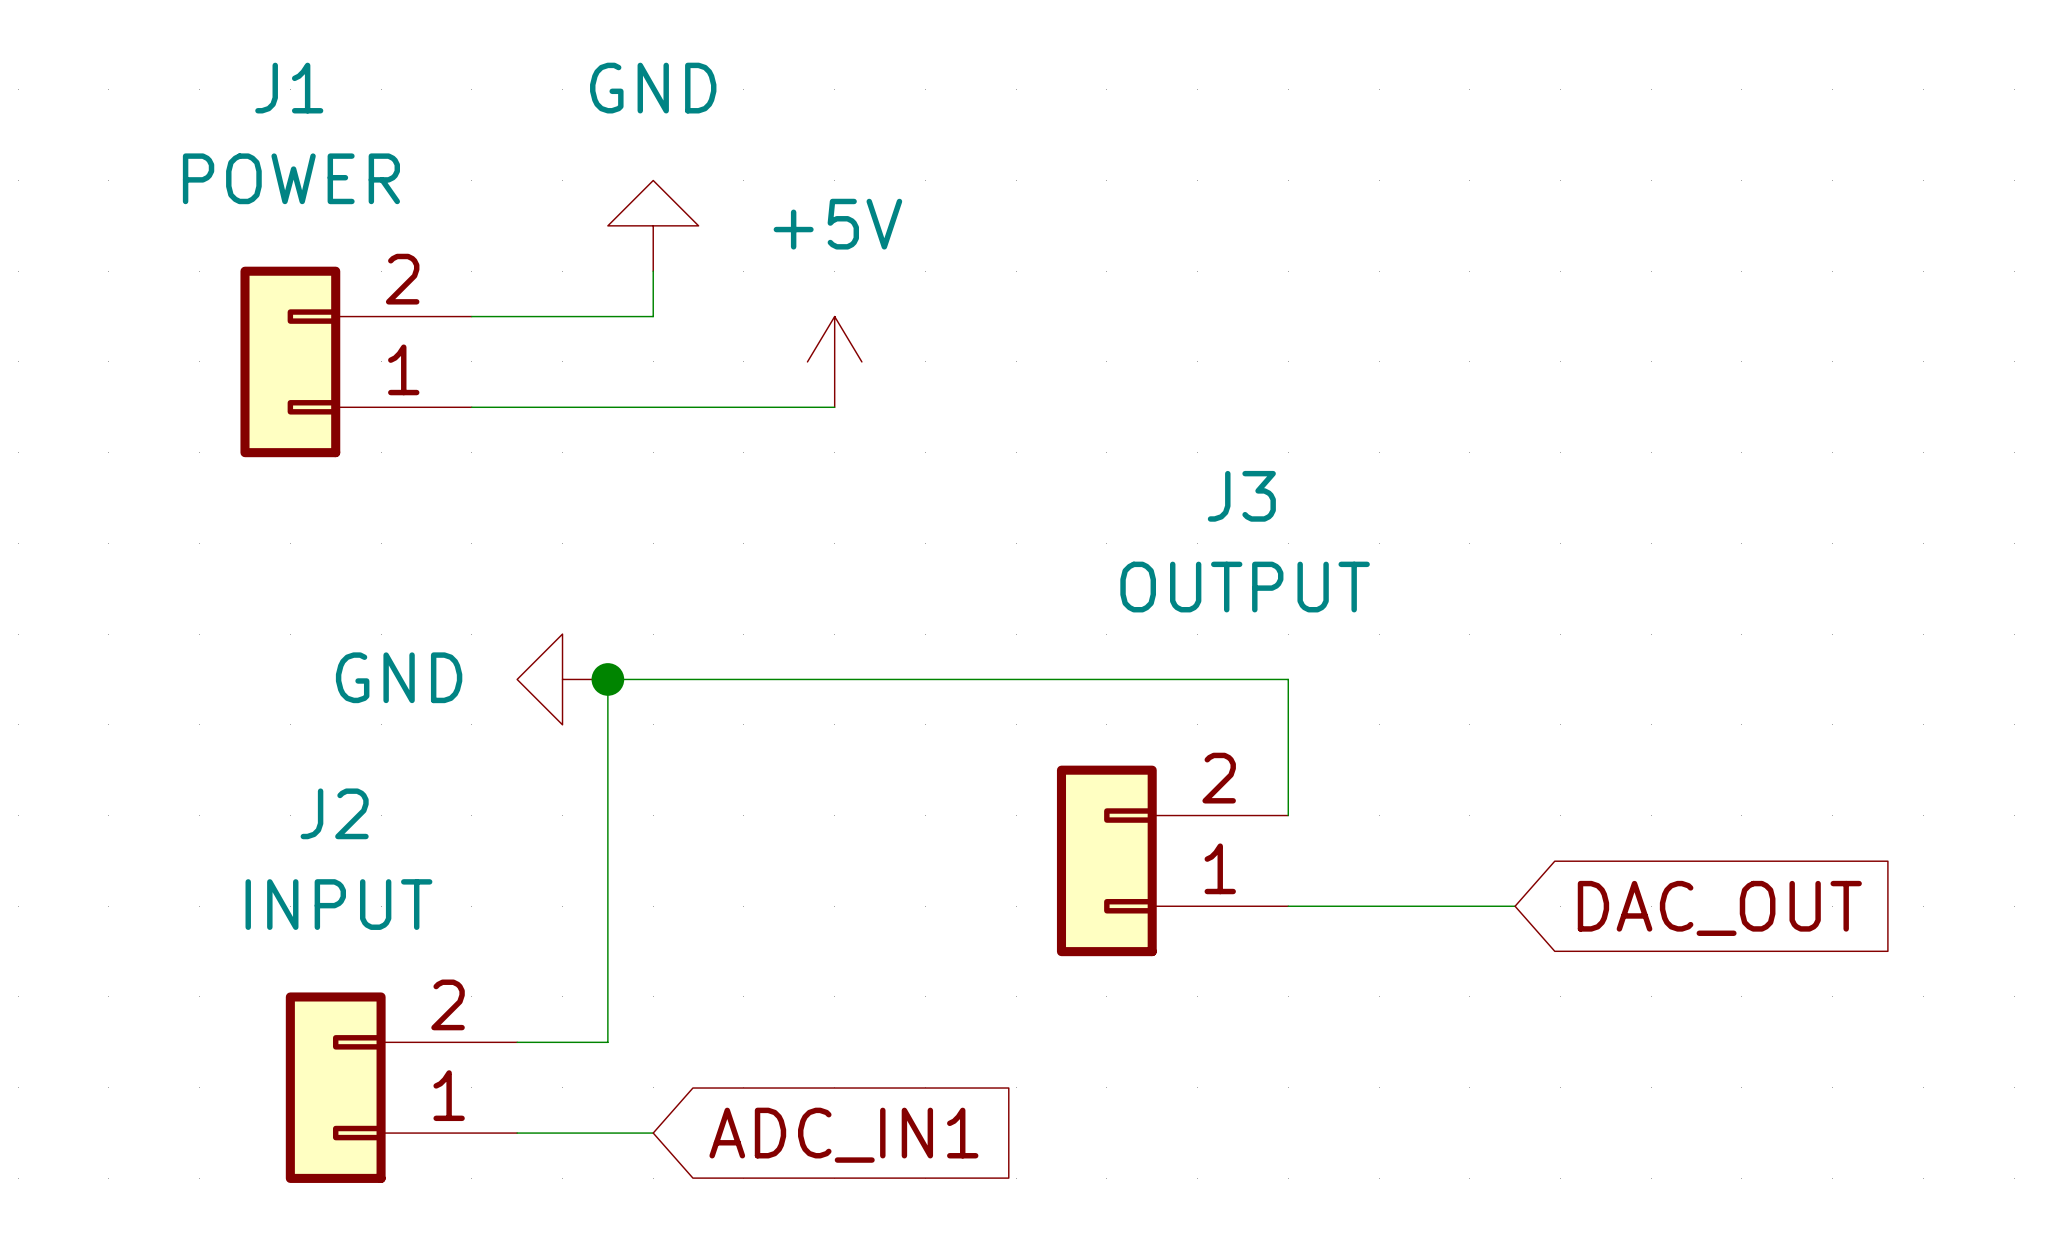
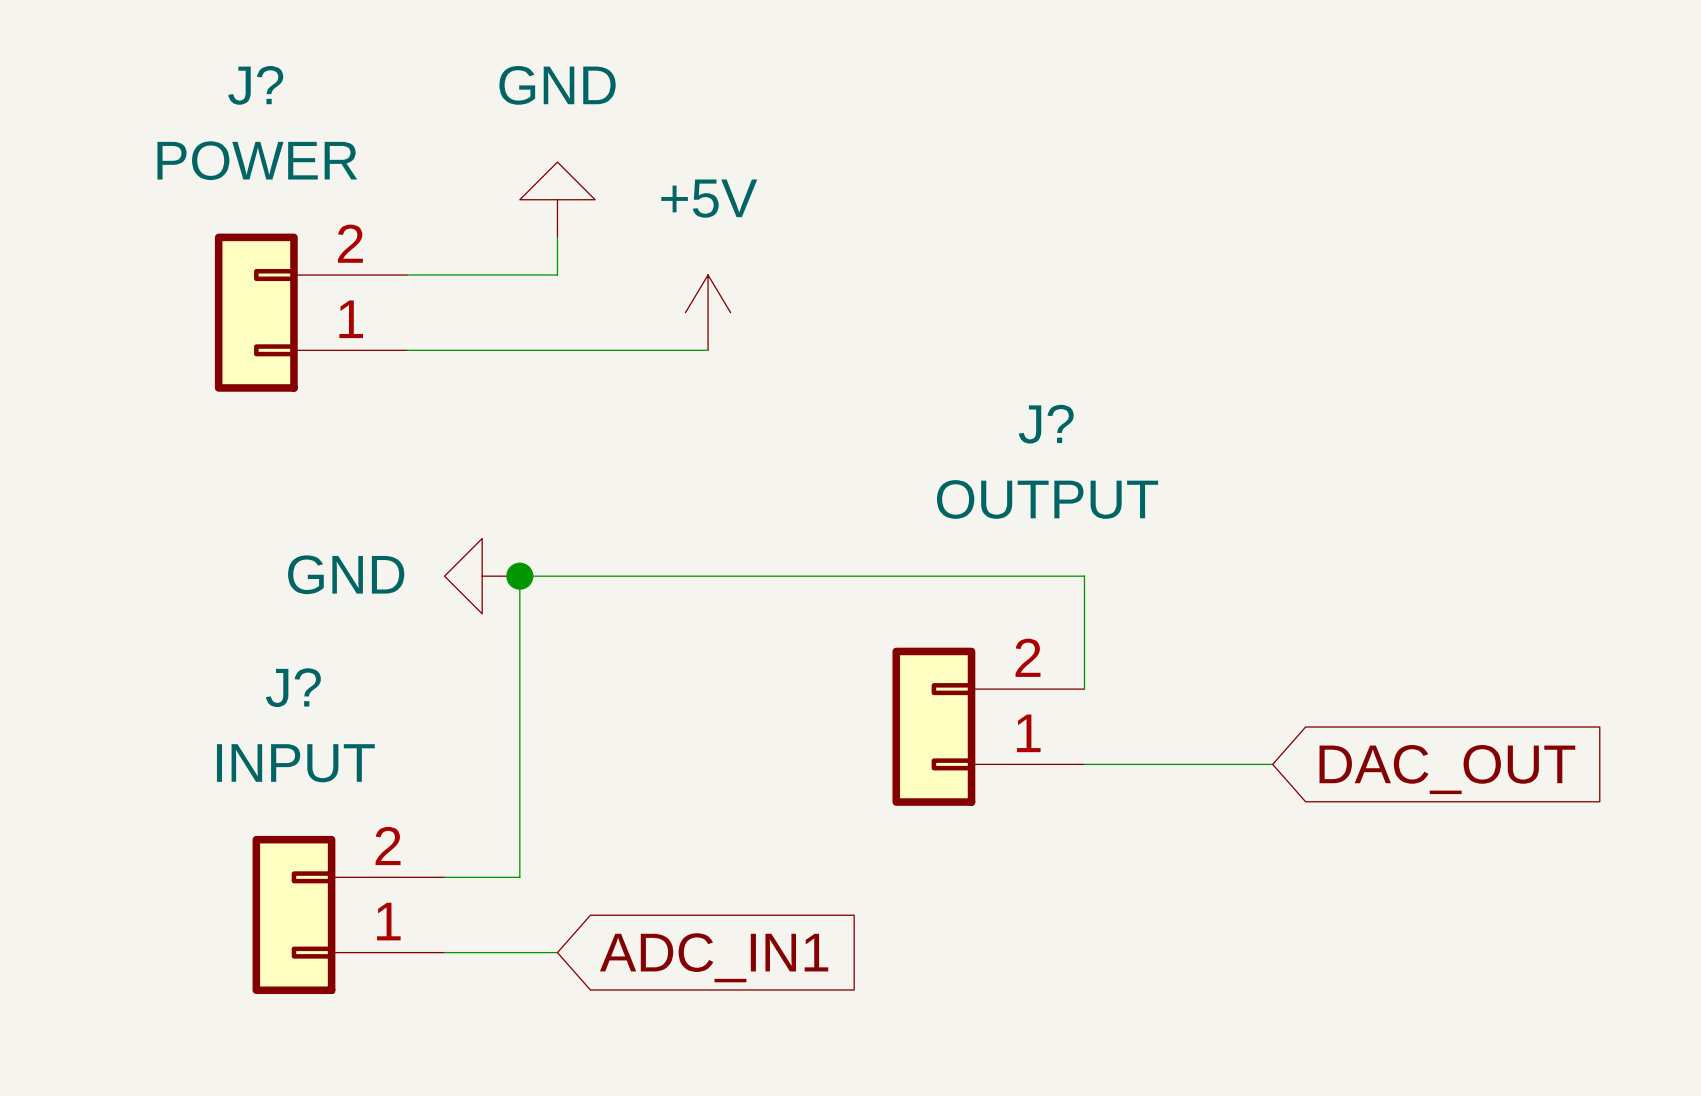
J1 name: J1 (289, 88) -> J? (255, 85)
J3 name: J3 (1241, 496) -> J? (1046, 424)
J2 name: J2 (334, 813) -> J? (293, 687)

